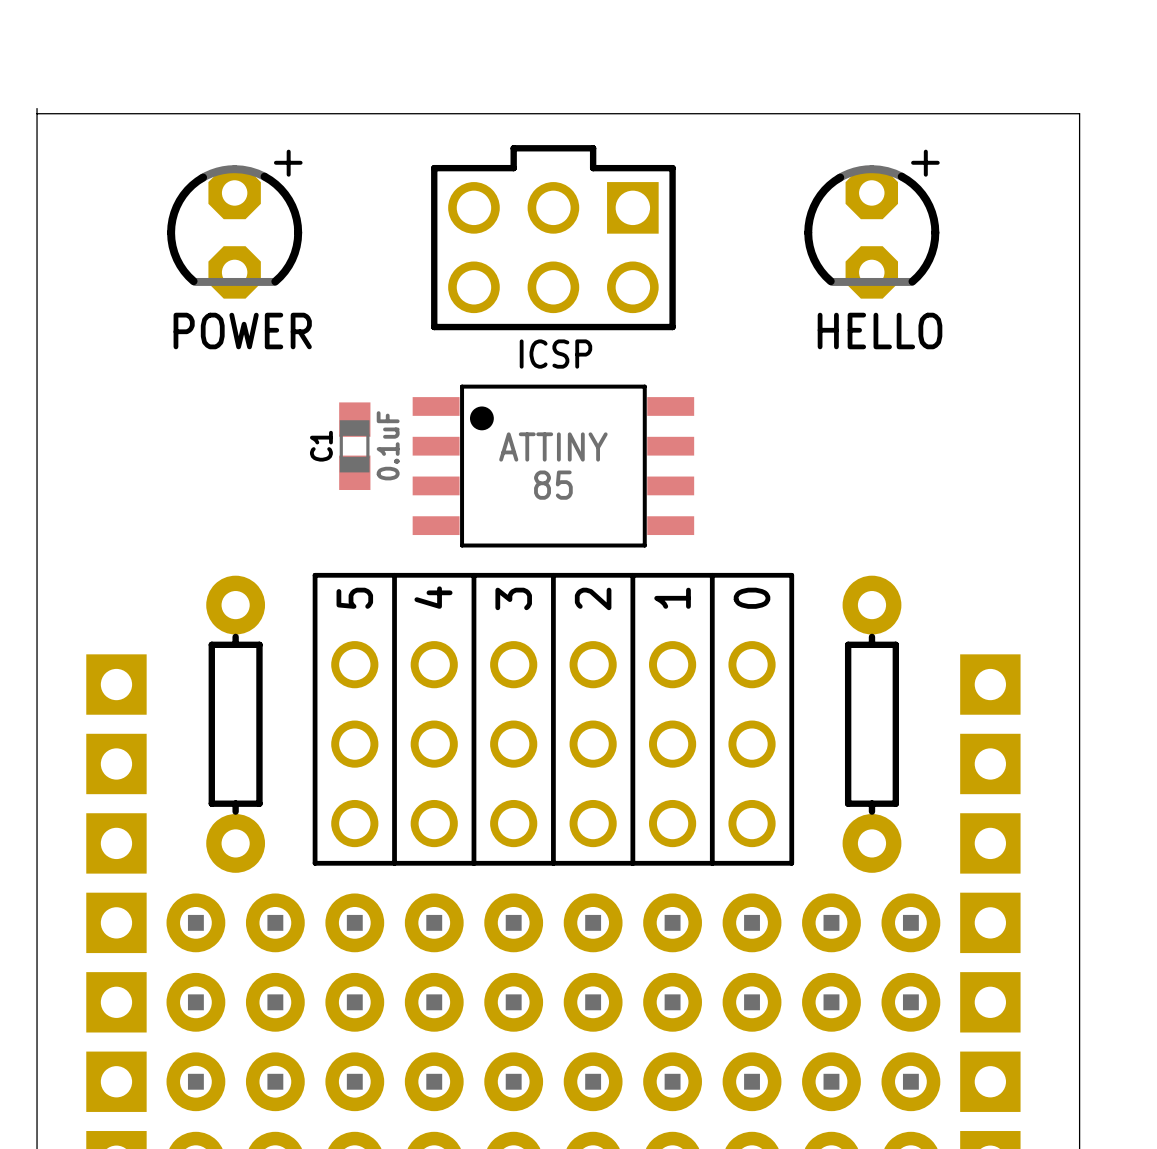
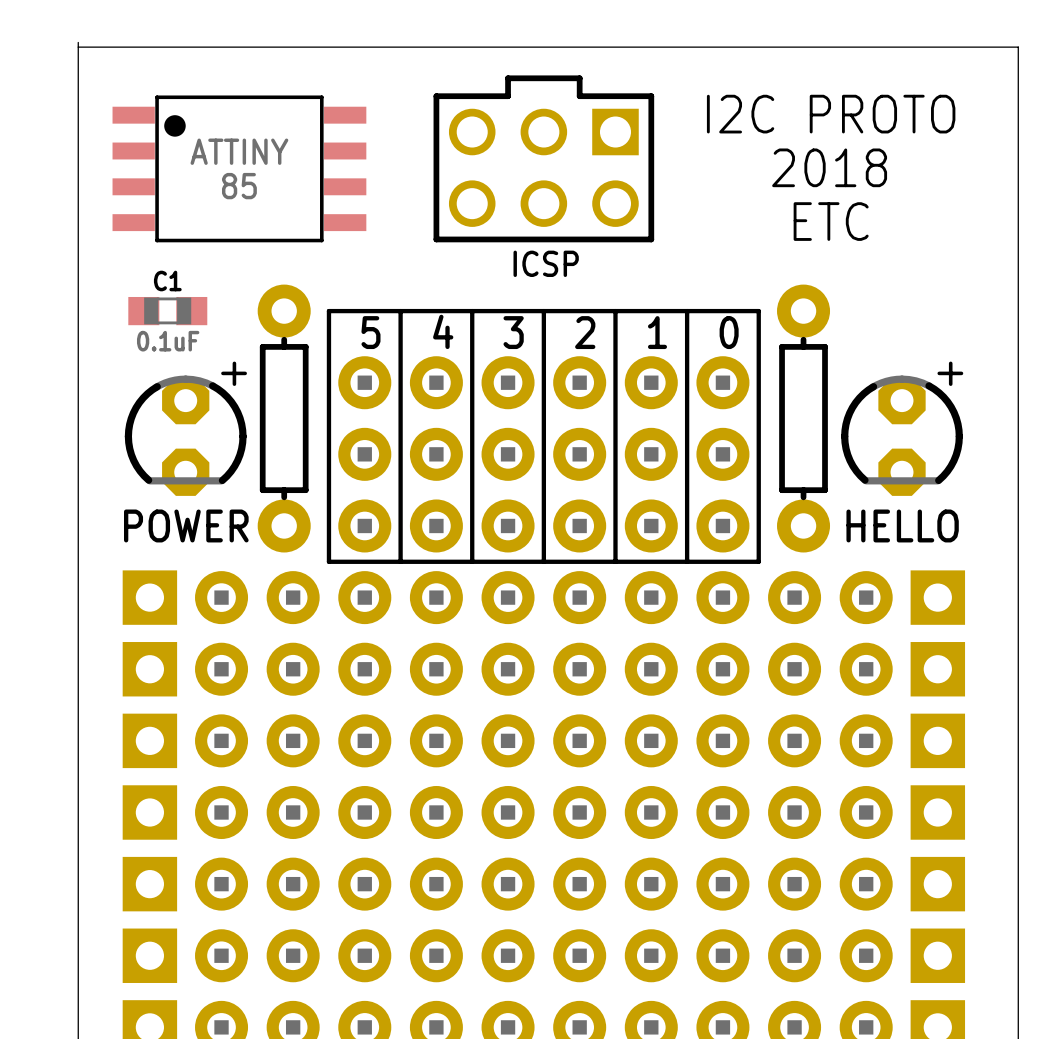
board edge: none -> (78, 42) (78, 78)
board edge: (37, 113) (1079, 113) -> (78, 47) (1018, 47) (1018, 82)
text: none -> I2C PROTO (831, 114)
part footprint: [167, 149, 303, 299] -> [112, 95, 367, 243]
text: none -> 2018 (829, 167)
part position: (871, 224) -> (902, 428)
part position: (553, 237) -> (543, 158)
text: none -> ETC (831, 221)
text position: POWER (242, 331) -> POWER (186, 525)
text position: HELLO (880, 331) -> HELLO (902, 525)
line: none -> (400, 311) (400, 499)
line: none -> (472, 311) (472, 499)
line: none -> (543, 311) (543, 499)
line: none -> (615, 311) (615, 499)
line: none -> (687, 311) (687, 499)
text: none -> 4 (443, 331)
text: none -> 5 (370, 332)
text: none -> 3 (513, 332)
text: none -> 2 (585, 332)
text: none -> 1 (657, 332)
text: none -> 0 (729, 332)
C1 rotation: 0° (354, 446) -> 90° clockwise (167, 311)
C1 position: (354, 446) -> (167, 311)
part: none -> (364, 382)
part: none -> (436, 382)
part: none -> (508, 382)
part: none -> (579, 382)
part: none -> (651, 382)
part: none -> (722, 382)
part: (553, 466) -> none
part: none -> (185, 428)
part: none -> (364, 454)
part: none -> (436, 454)
part: none -> (508, 454)
part: none -> (579, 454)
part: none -> (651, 454)
part: none -> (722, 454)
line: (315, 575) (791, 575) -> (328, 499) (328, 311) (758, 311) (758, 499)
part: none -> (364, 525)
part: none -> (436, 525)
part: none -> (508, 525)
part: none -> (579, 525)
part: none -> (651, 525)
part: none -> (722, 525)
line: (315, 644) (315, 863) (791, 863) (791, 644) -> (328, 561) (758, 561)
line: (394, 644) (394, 863) -> none
line: (473, 644) (473, 863) -> none
line: (553, 644) (553, 863) -> none
line: (632, 644) (632, 863) -> none
line: (712, 644) (712, 863) -> none
part: none -> (221, 597)
part: none -> (293, 597)
part: none -> (364, 597)
part: none -> (436, 597)
part: none -> (508, 597)
part: none -> (579, 597)
part: none -> (651, 597)
part: none -> (722, 597)
part: none -> (794, 597)
part: none -> (866, 597)
part position: (235, 724) -> (284, 418)
part position: (871, 724) -> (803, 418)
5: (354, 744) -> none
4: (434, 744) -> none
3: (513, 744) -> none
2: (593, 744) -> none
1: (672, 744) -> none
0: (752, 744) -> none
part: none -> (221, 669)
part: none -> (293, 669)
part: none -> (364, 669)
part: none -> (436, 669)
part: none -> (508, 669)
part: none -> (579, 669)
part: none -> (651, 669)
part: none -> (722, 669)
part: none -> (794, 669)
part: none -> (866, 669)
part: none -> (221, 740)
part: none -> (293, 740)
part: none -> (364, 740)
part: none -> (436, 740)
part: none -> (508, 740)
part: none -> (579, 740)
part: none -> (651, 740)
part: none -> (722, 740)
part: none -> (794, 740)
part: none -> (866, 740)

